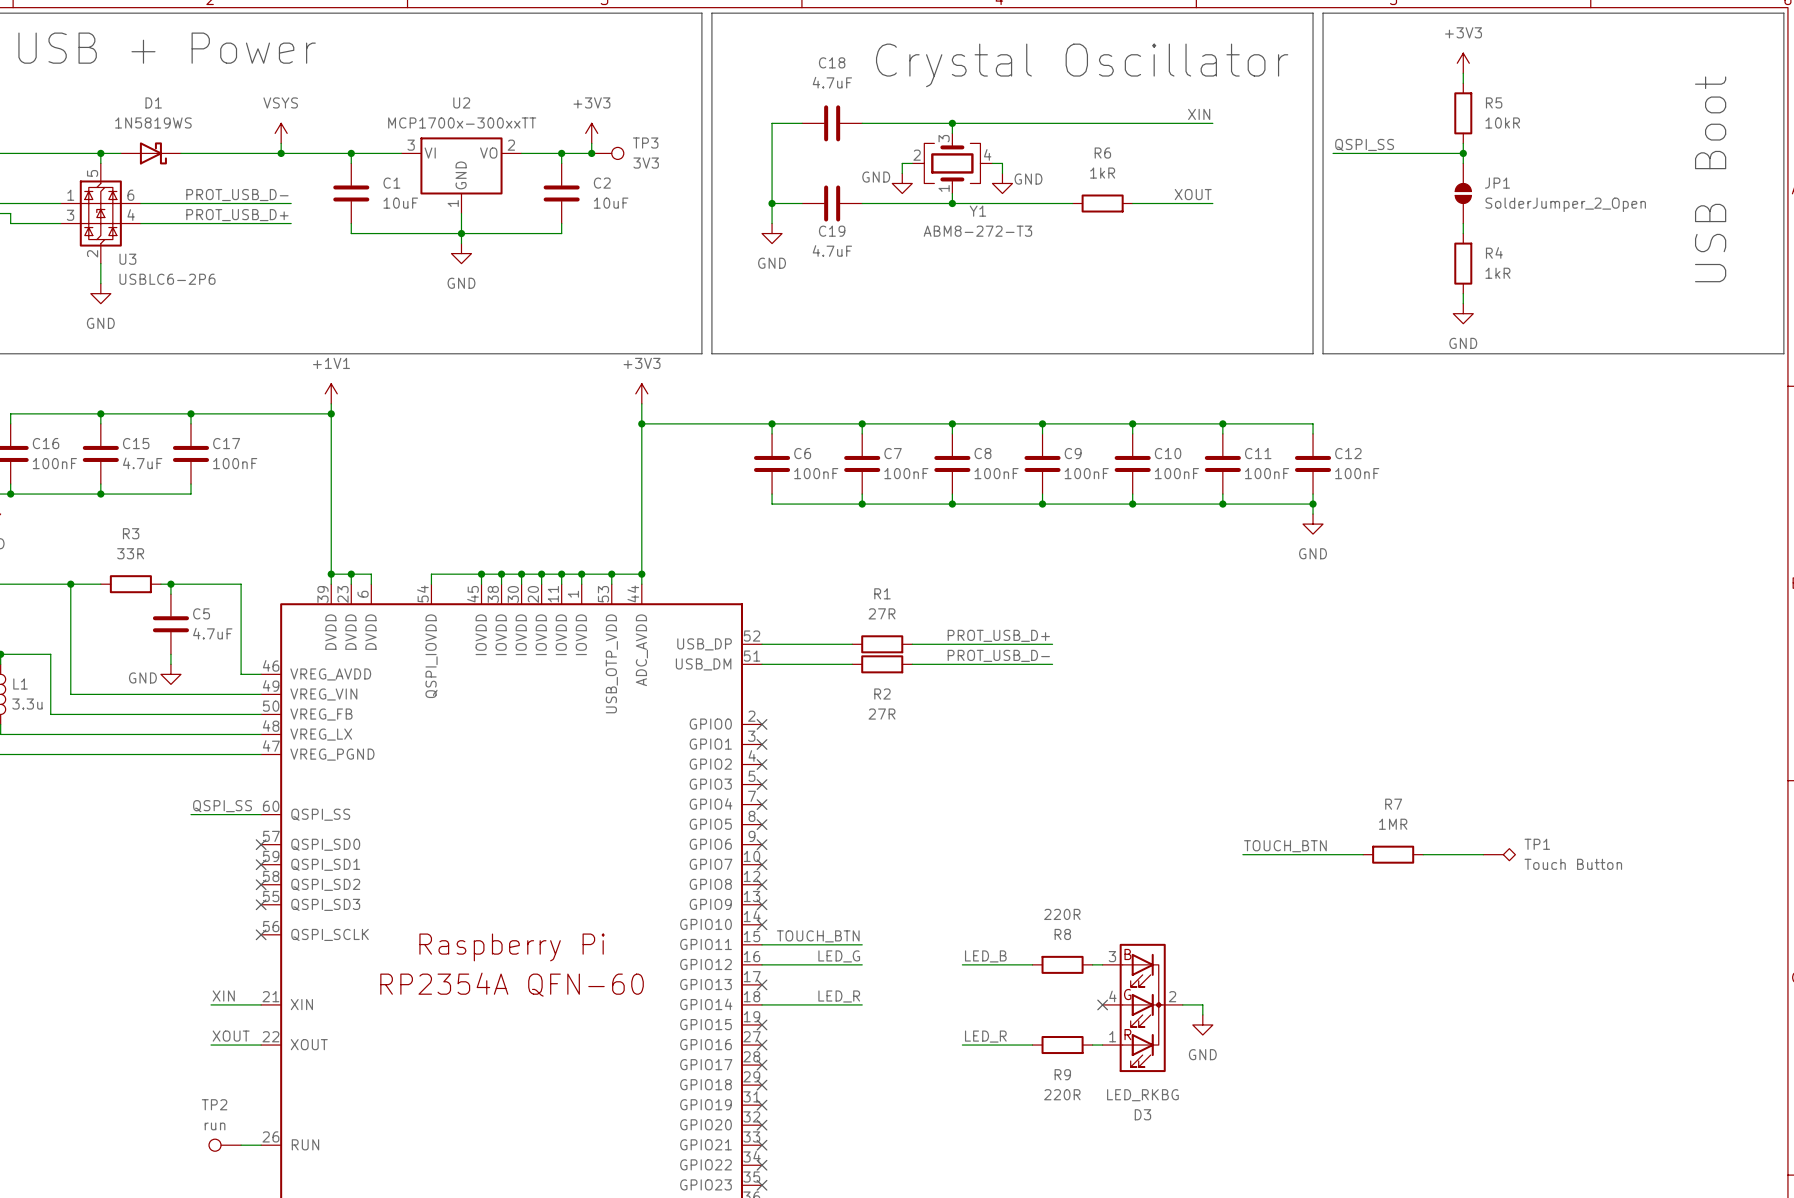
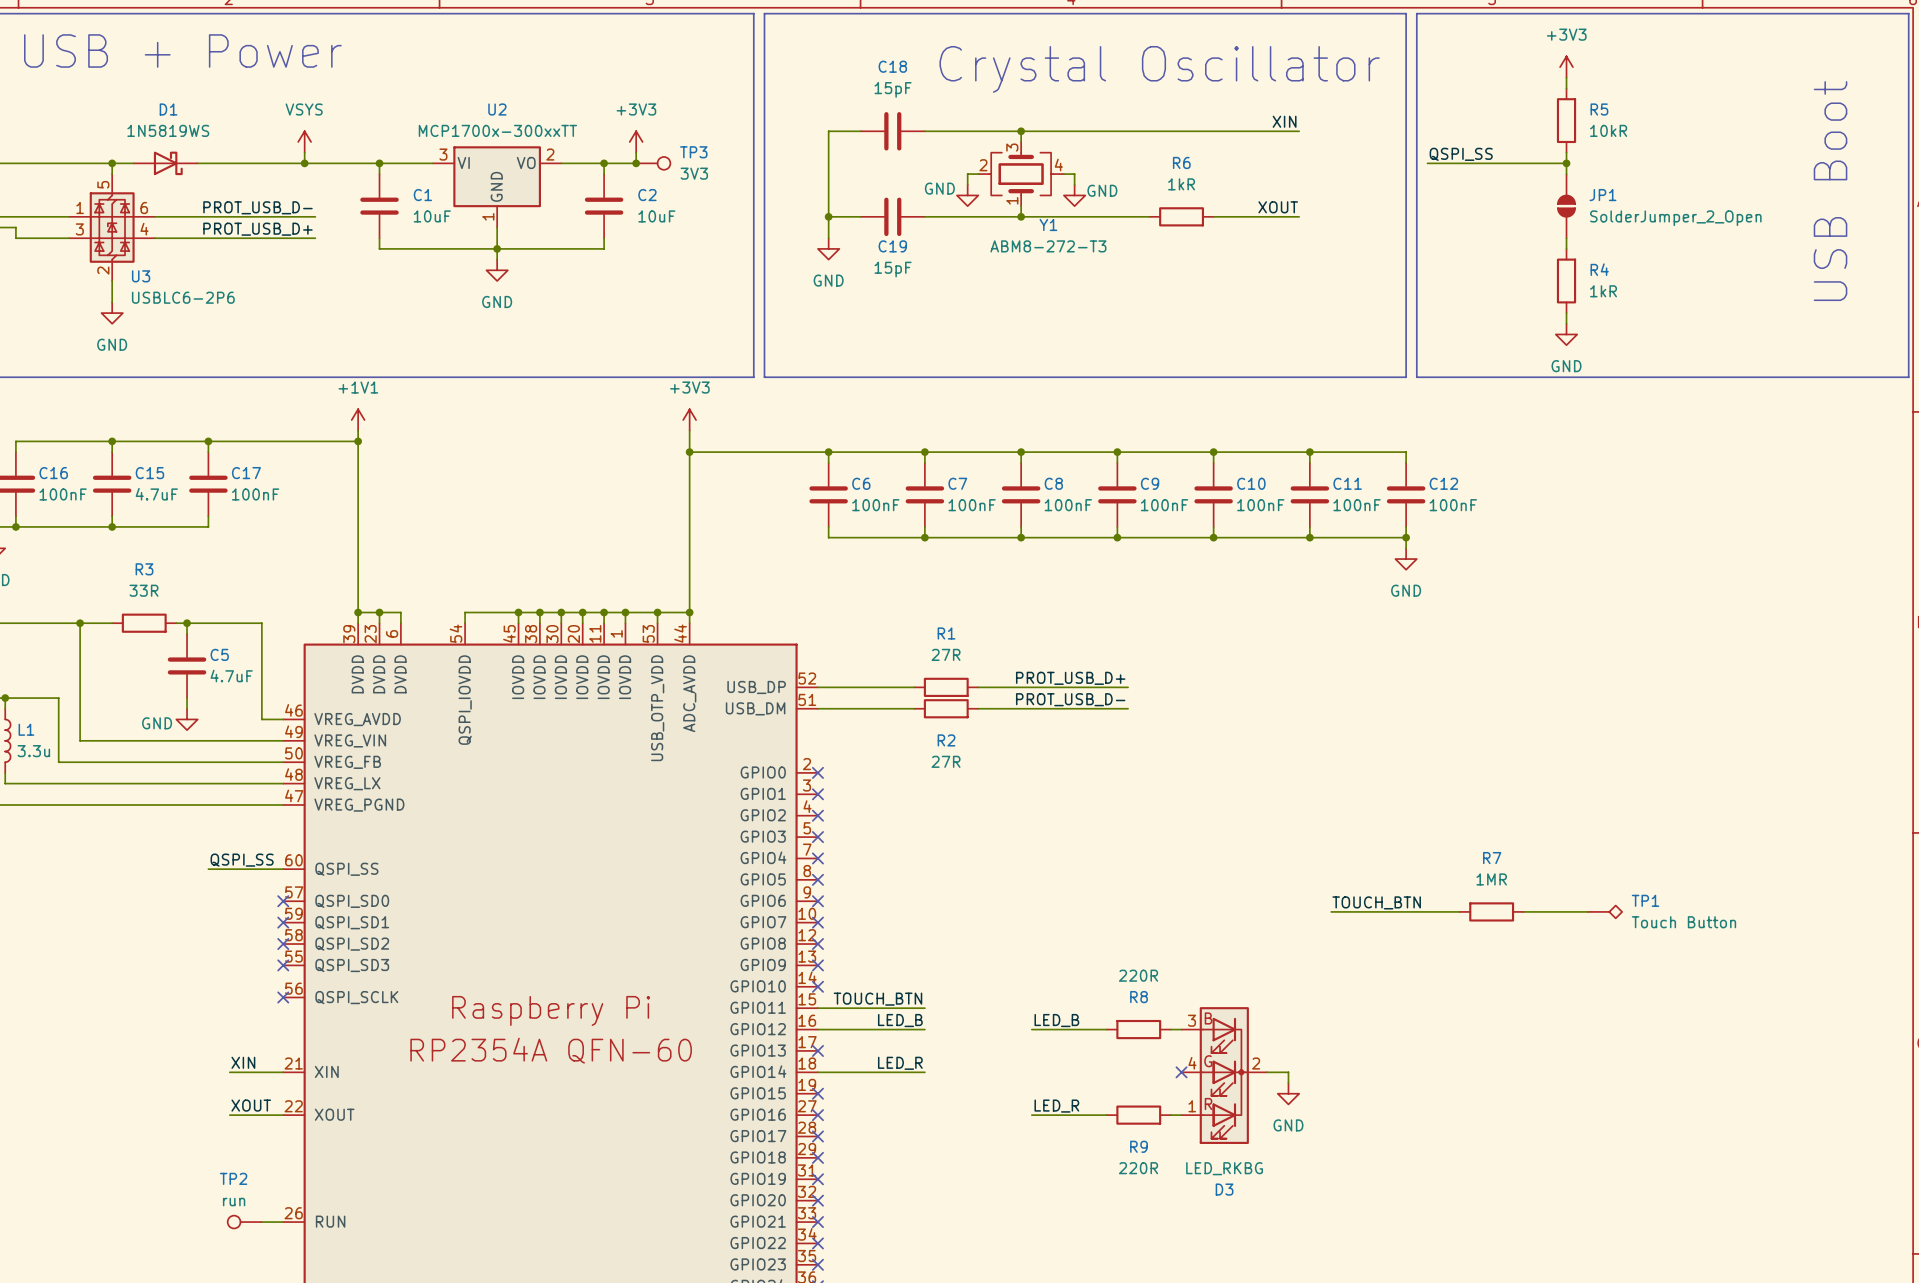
C18 value: 4.7uF (832, 82) -> 15pF (893, 89)
C19 value: 4.7uF (832, 250) -> 15pF (893, 269)
label: LED_G (839, 956) -> LED_B (900, 1020)

